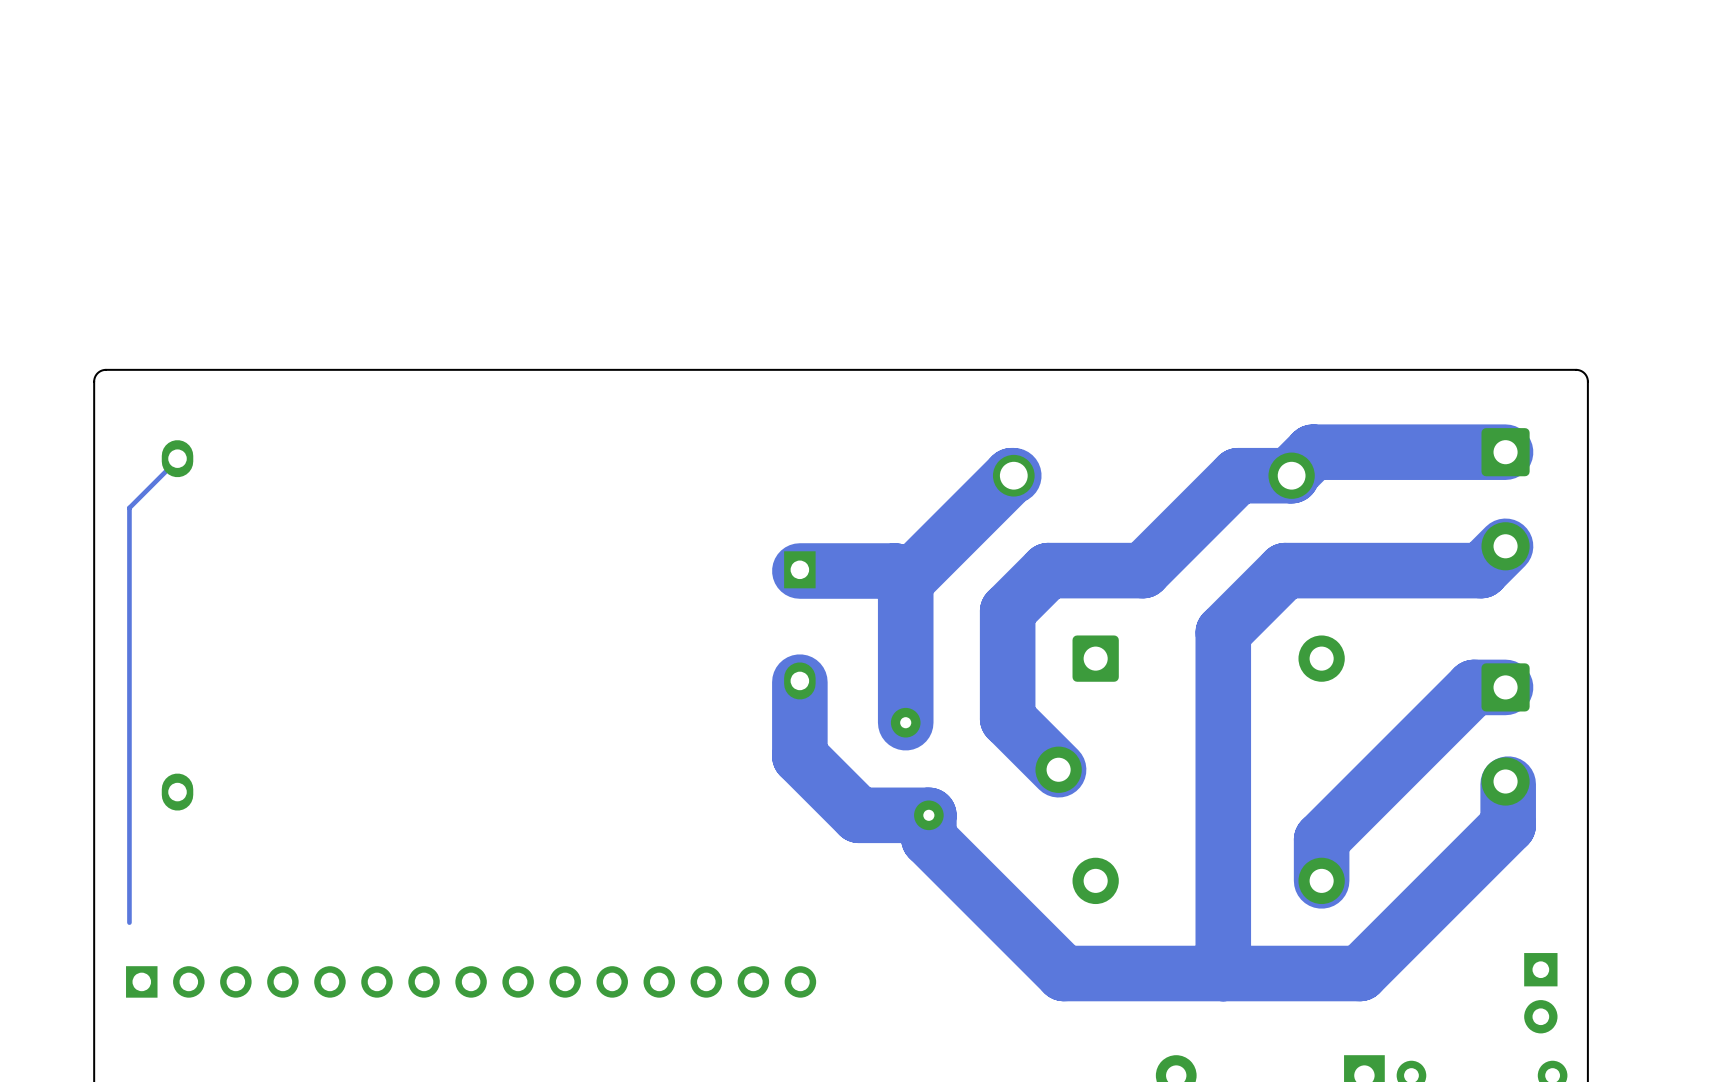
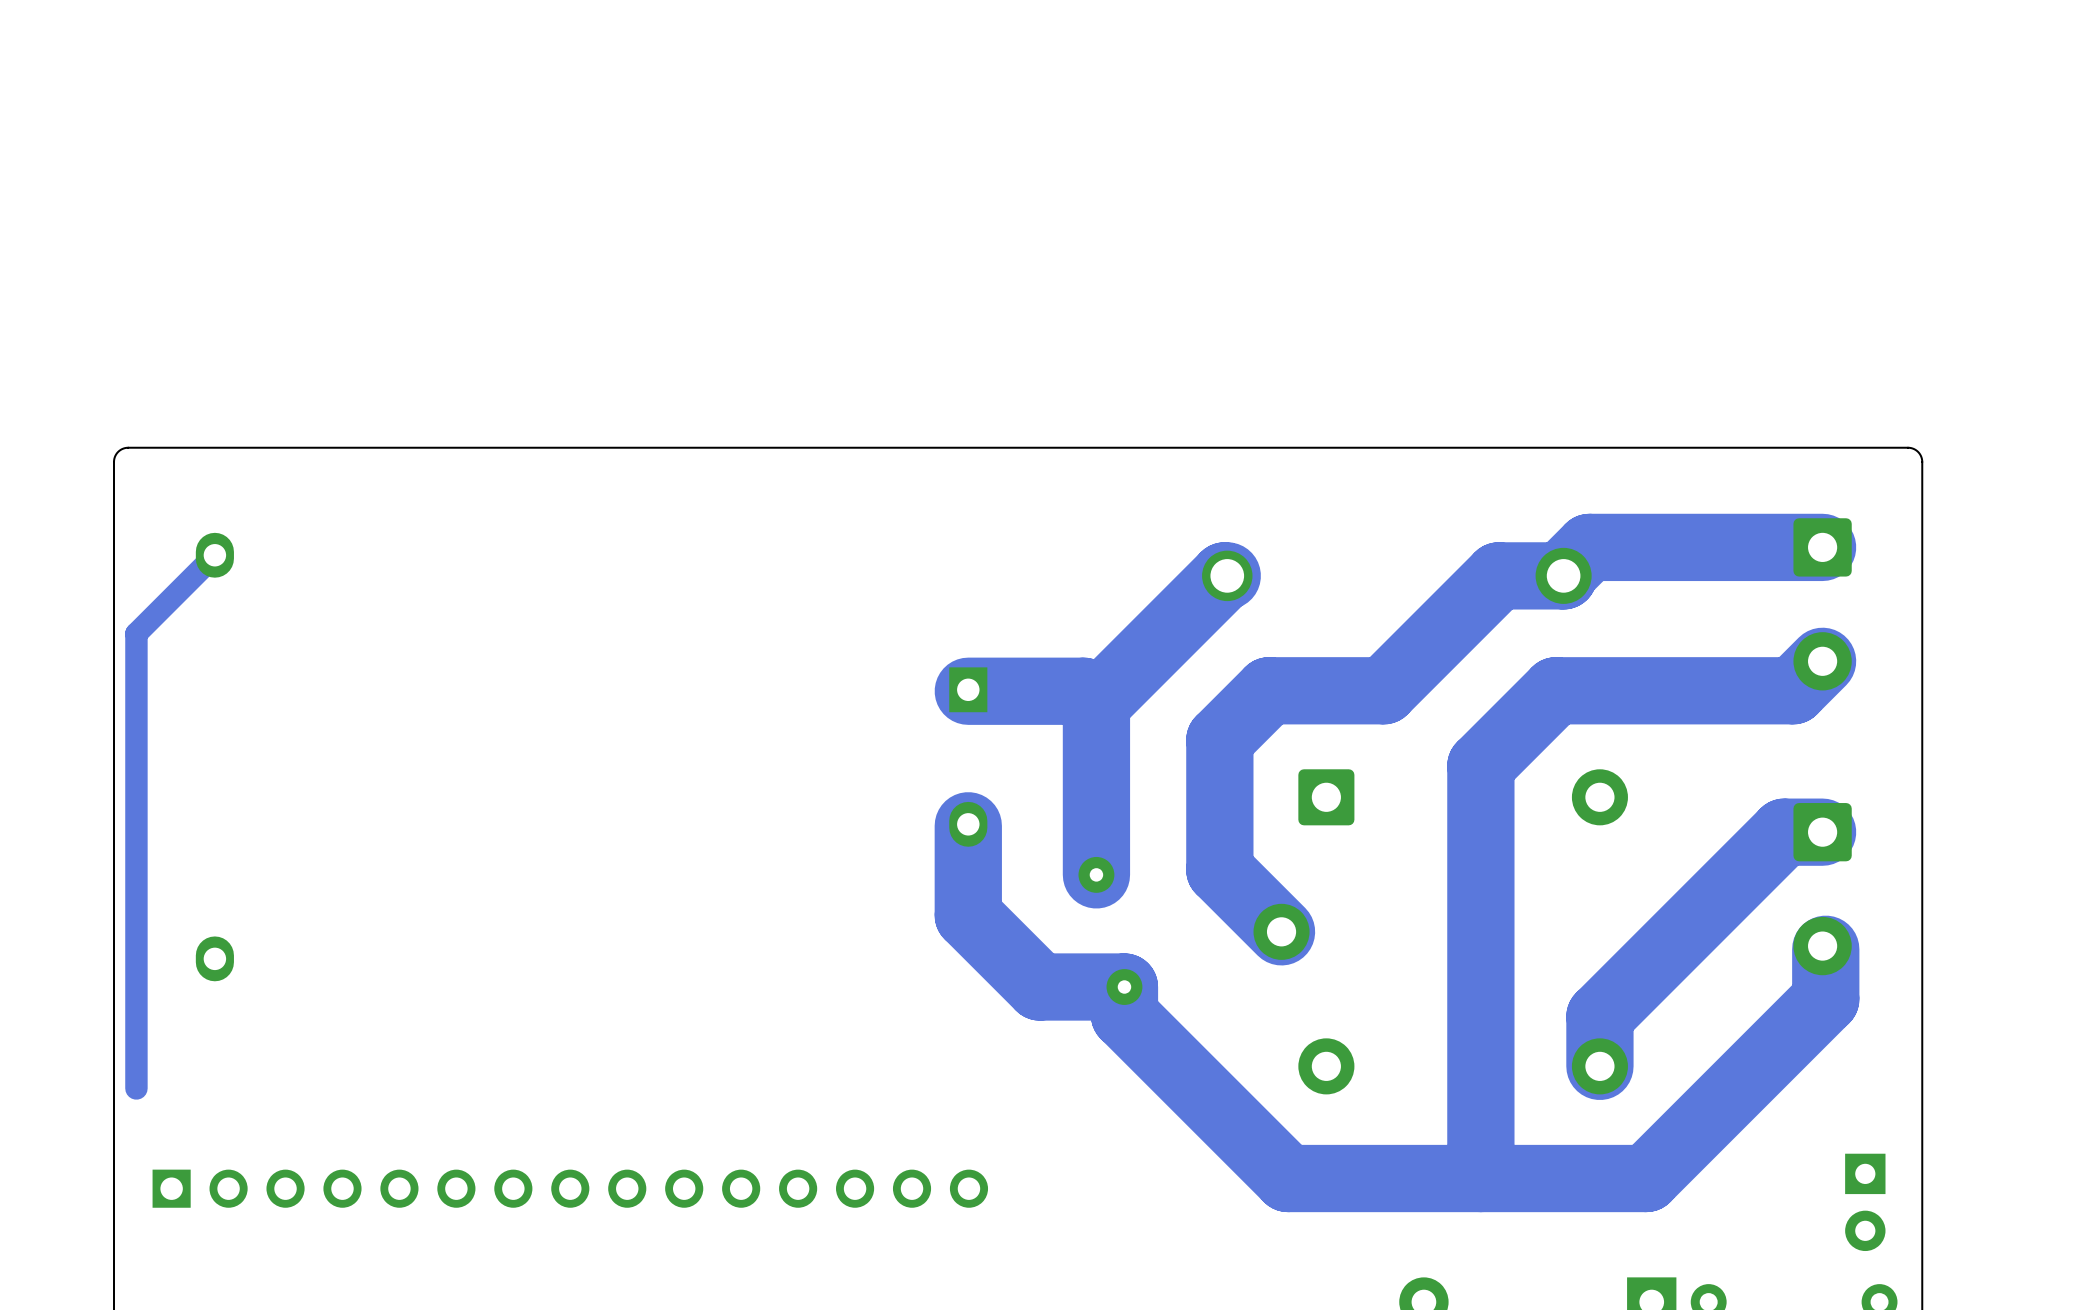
track: none -> (214, 555) (136, 633) (136, 1088)
track: (177, 459) (129, 507) (129, 922) -> none

